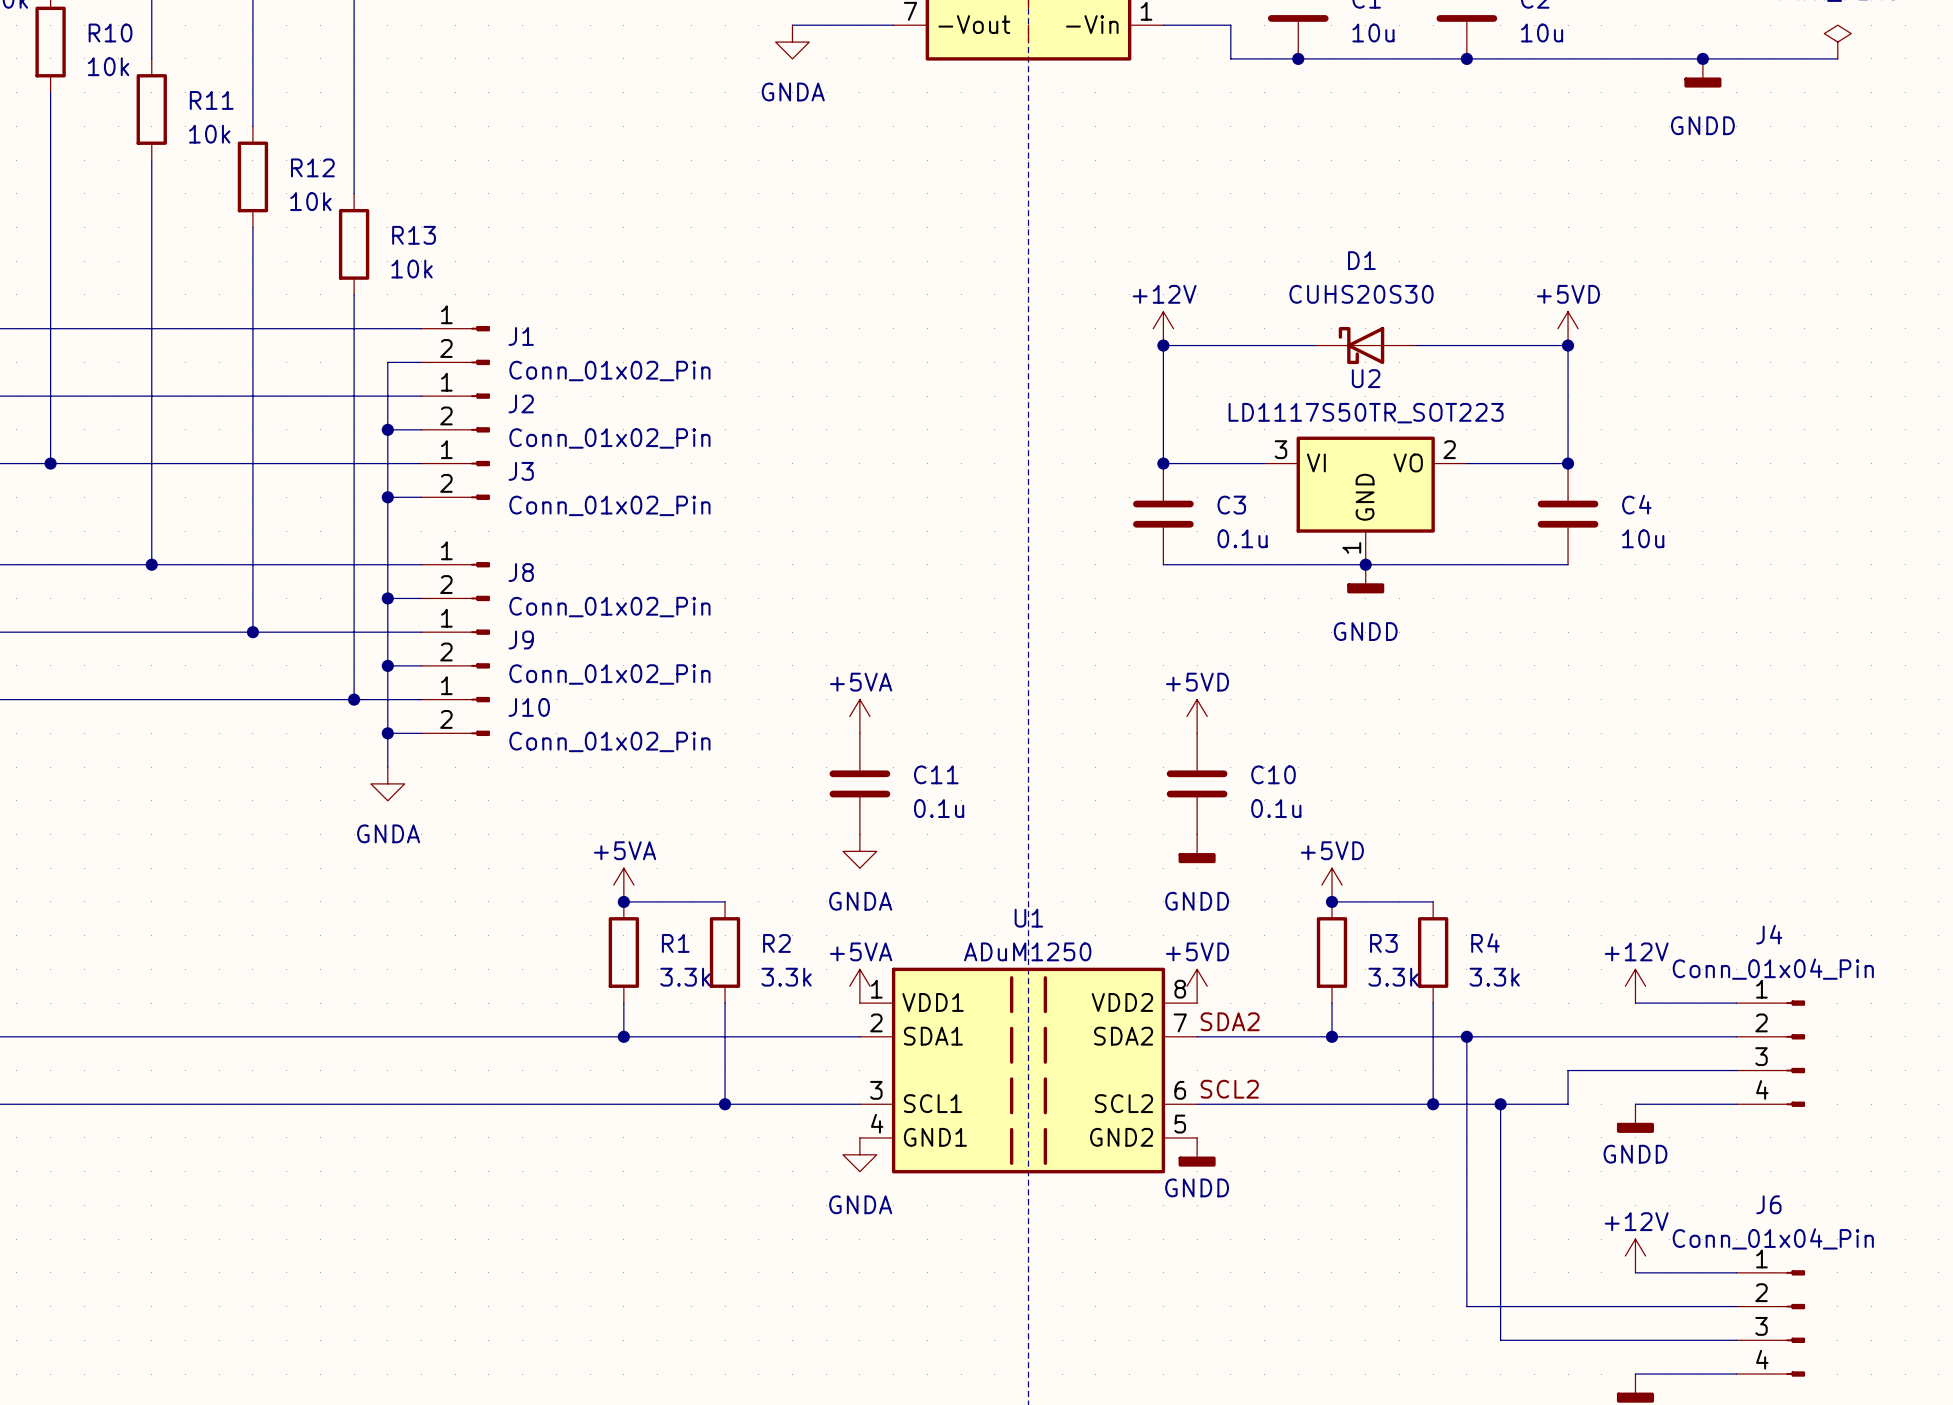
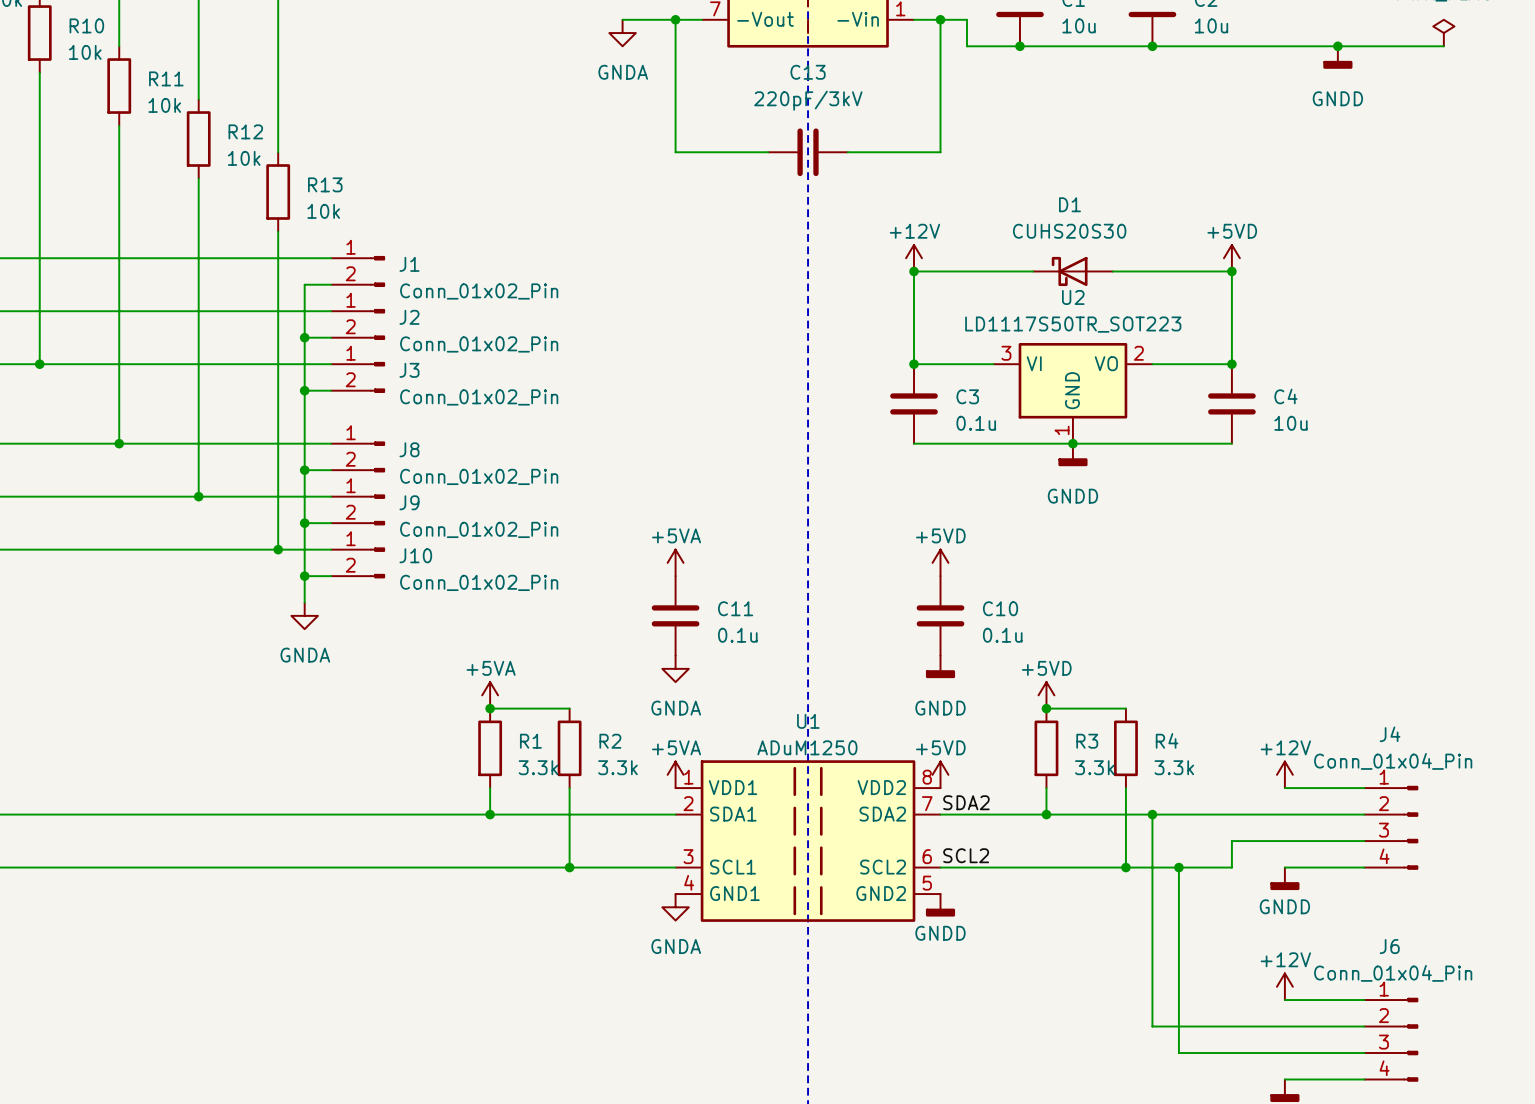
wire: none -> (675, 19) (675, 152) (768, 152)
junction: none -> (675, 19)
wire: none -> (940, 19) (940, 152) (847, 152)
junction: none -> (940, 19)
C13: none -> 220pF/3kV (808, 152)

